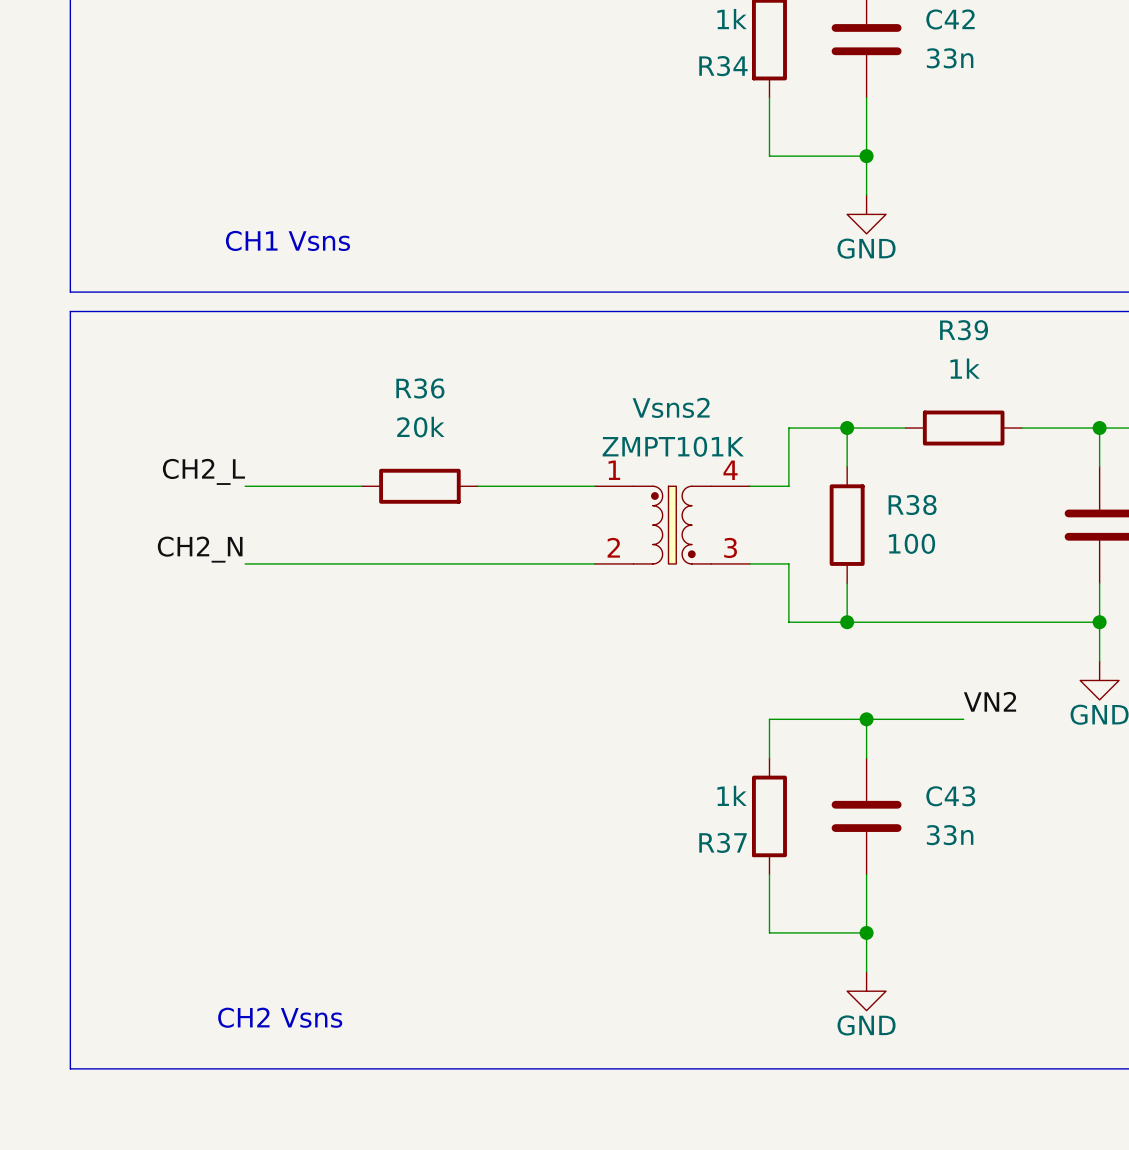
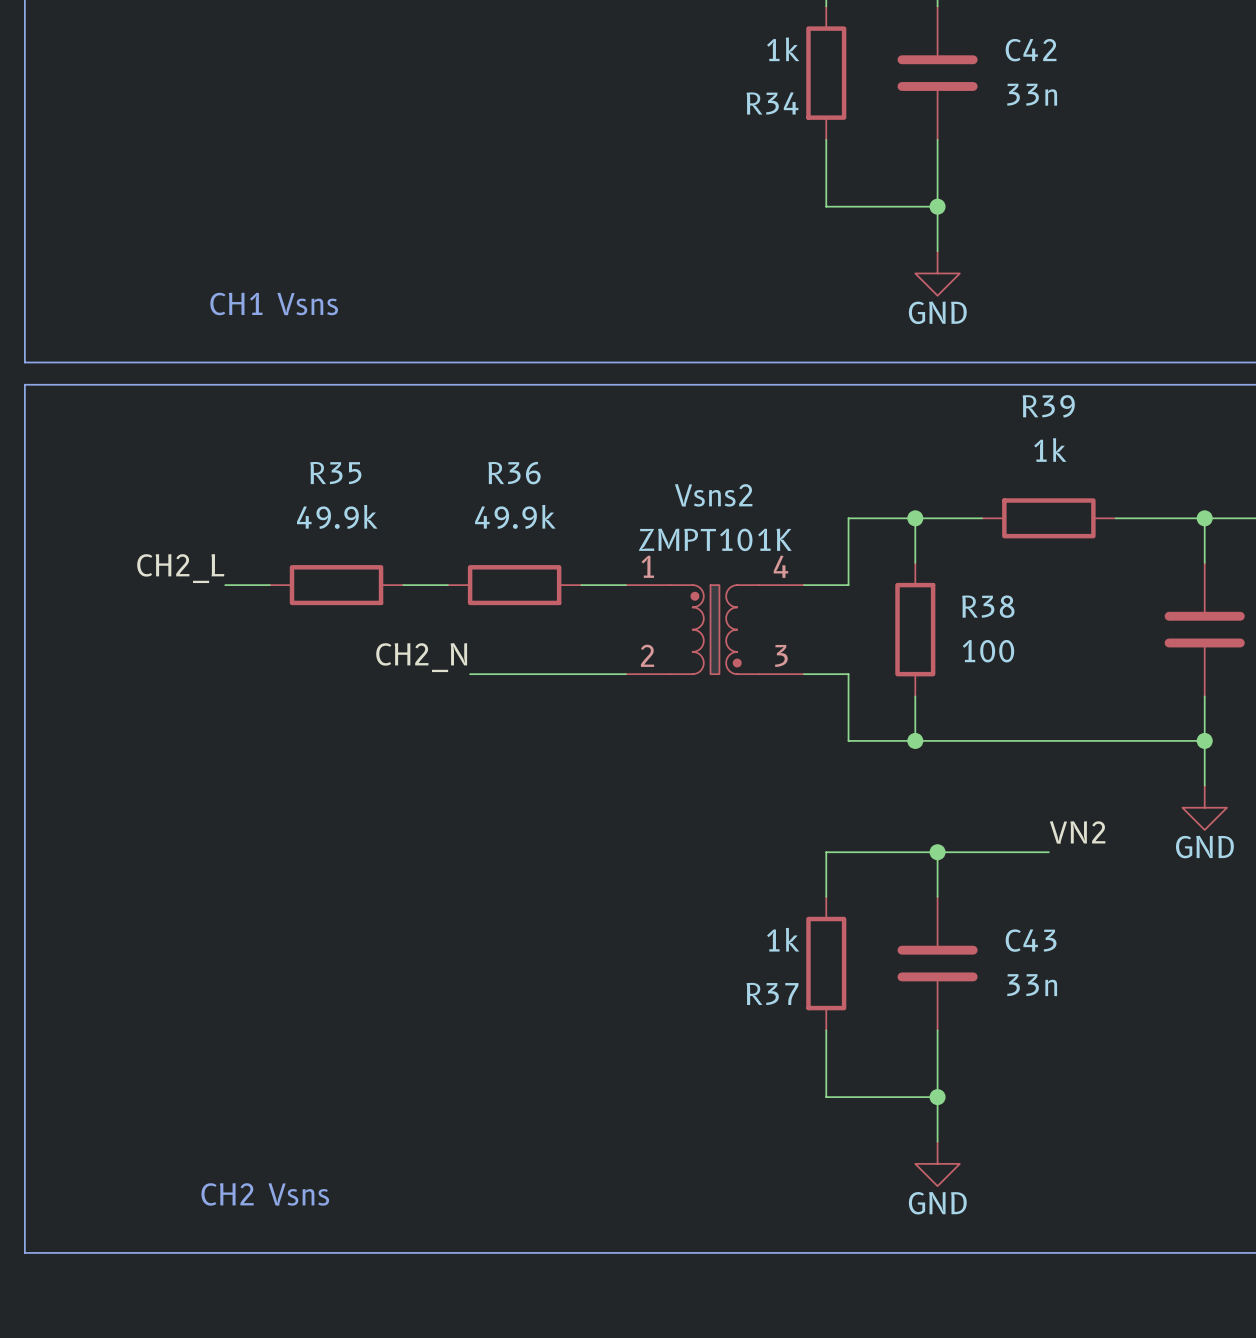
R36 value: 20k (420, 427) -> 49.9k (515, 516)
wire: (283, 486) (361, 486) -> none
R35: none -> 49.9k (336, 585)
wire: none -> (403, 585) (447, 585)
R36 position: (419, 486) -> (514, 585)
wire: (478, 486) (555, 486) -> none
label position: CH2_N (200, 549) -> CH2_N (421, 657)
wire: (245, 563) (458, 563) -> none

